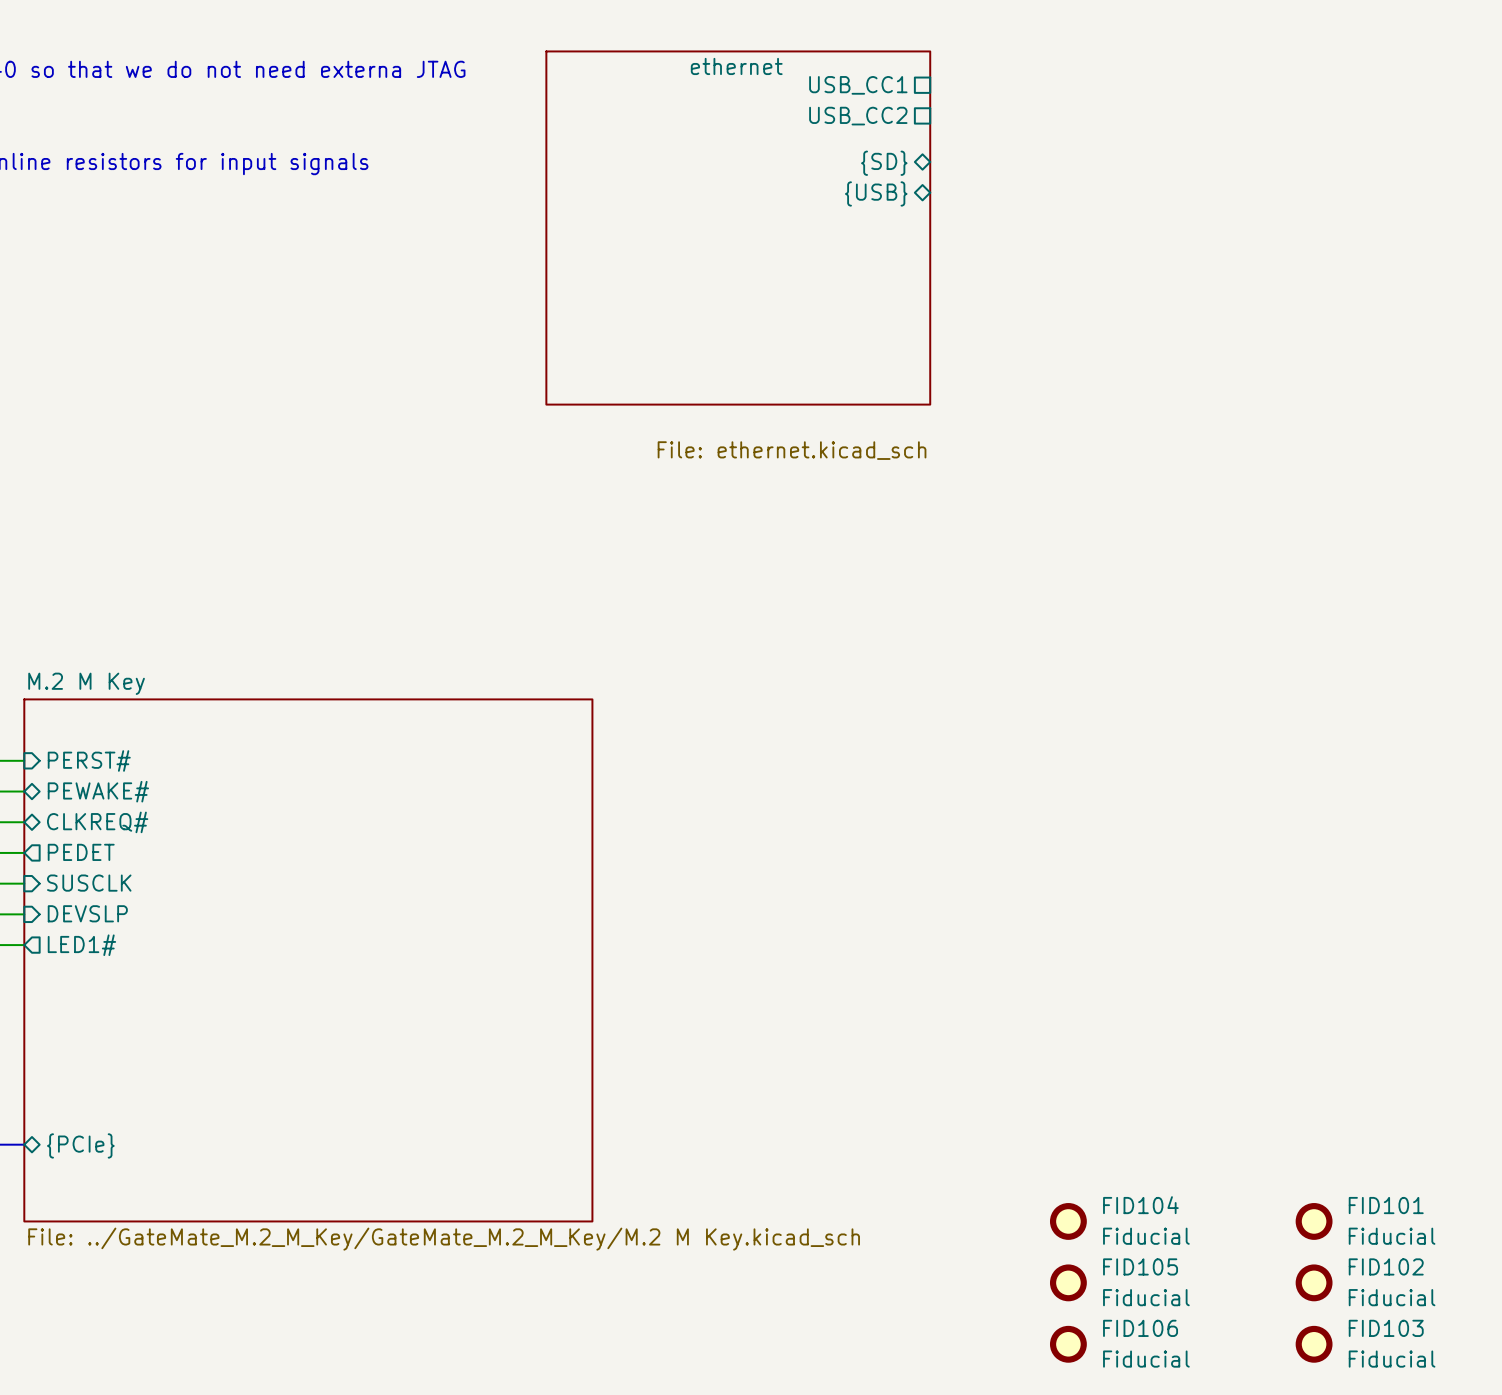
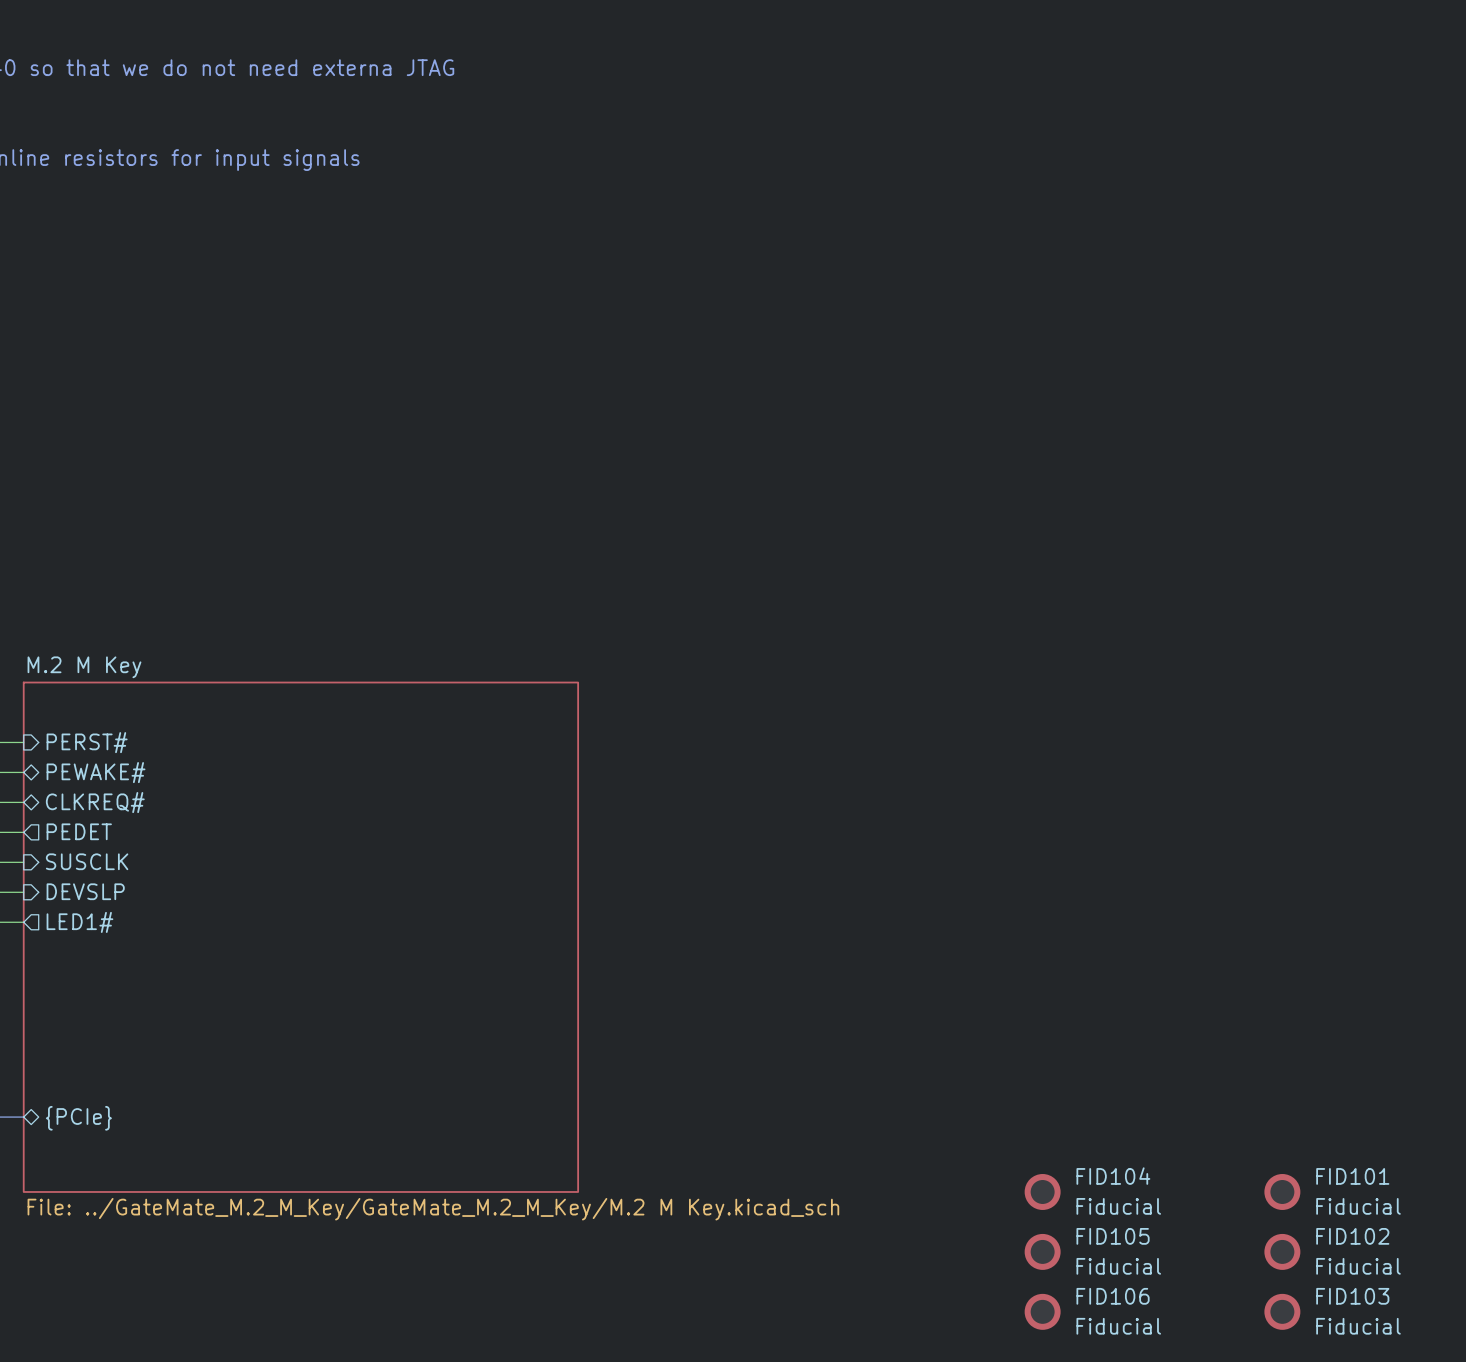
sheet pin: USB_CC1 (858, 85) -> none
sheet pin: USB_CC2 (858, 116) -> none
sheet pin: {SD} (884, 163) -> none
sheet pin: {USB} (876, 193) -> none
sheet ethernet: File: ethernet.kicad_sch (738, 228) -> none

